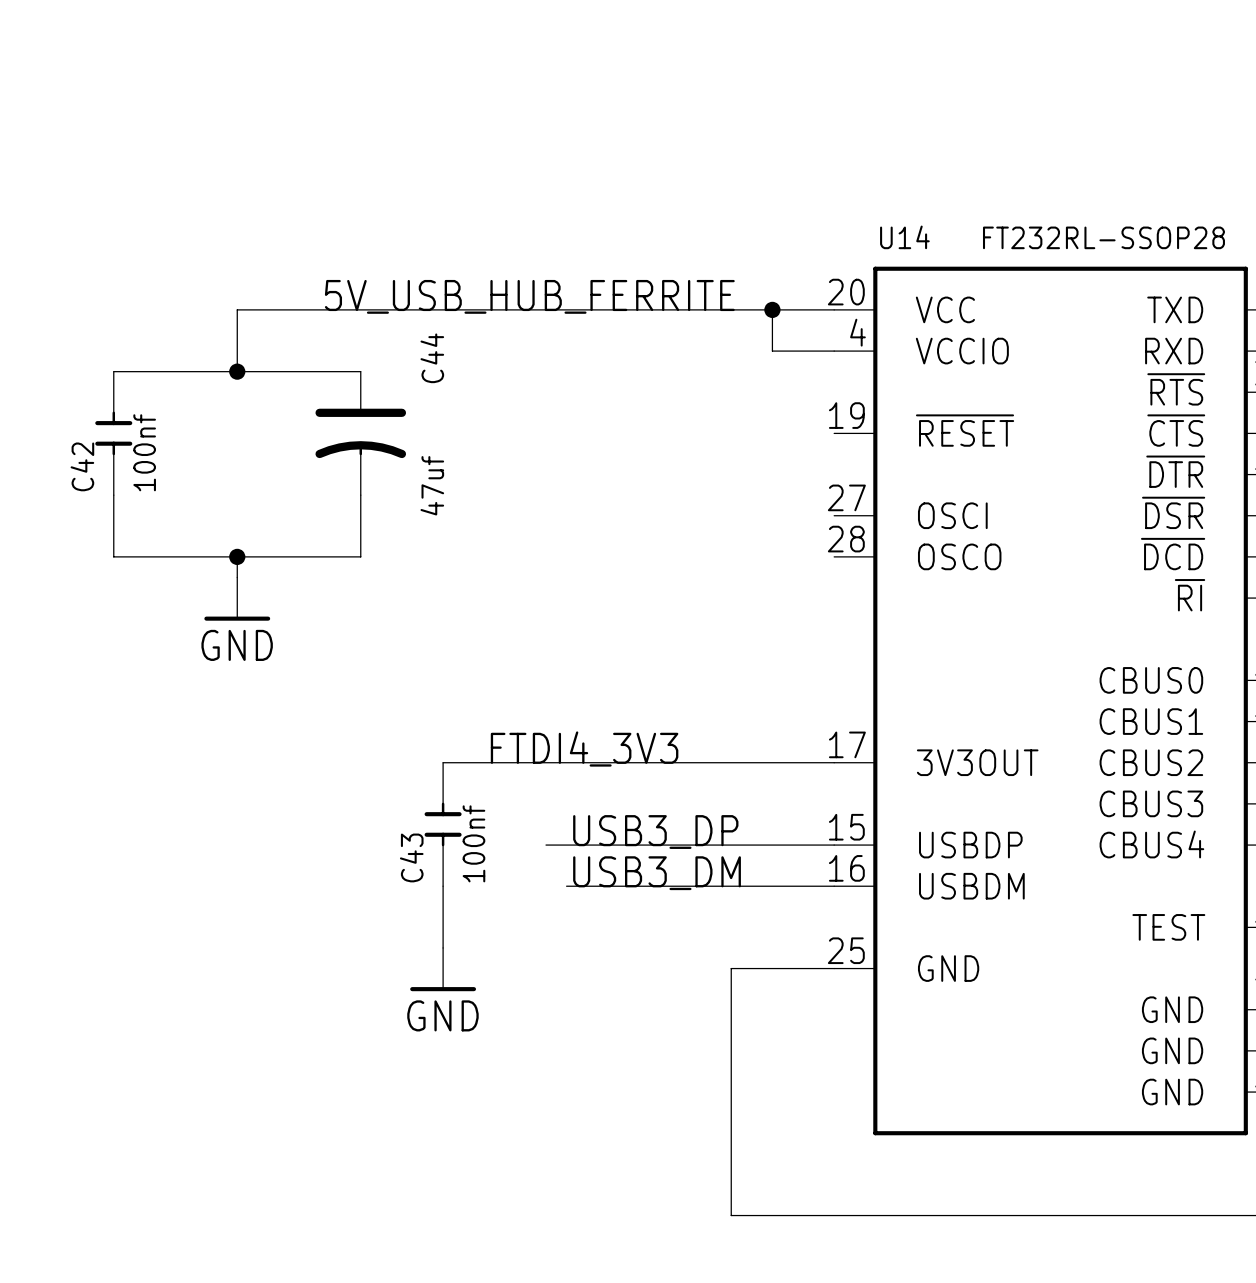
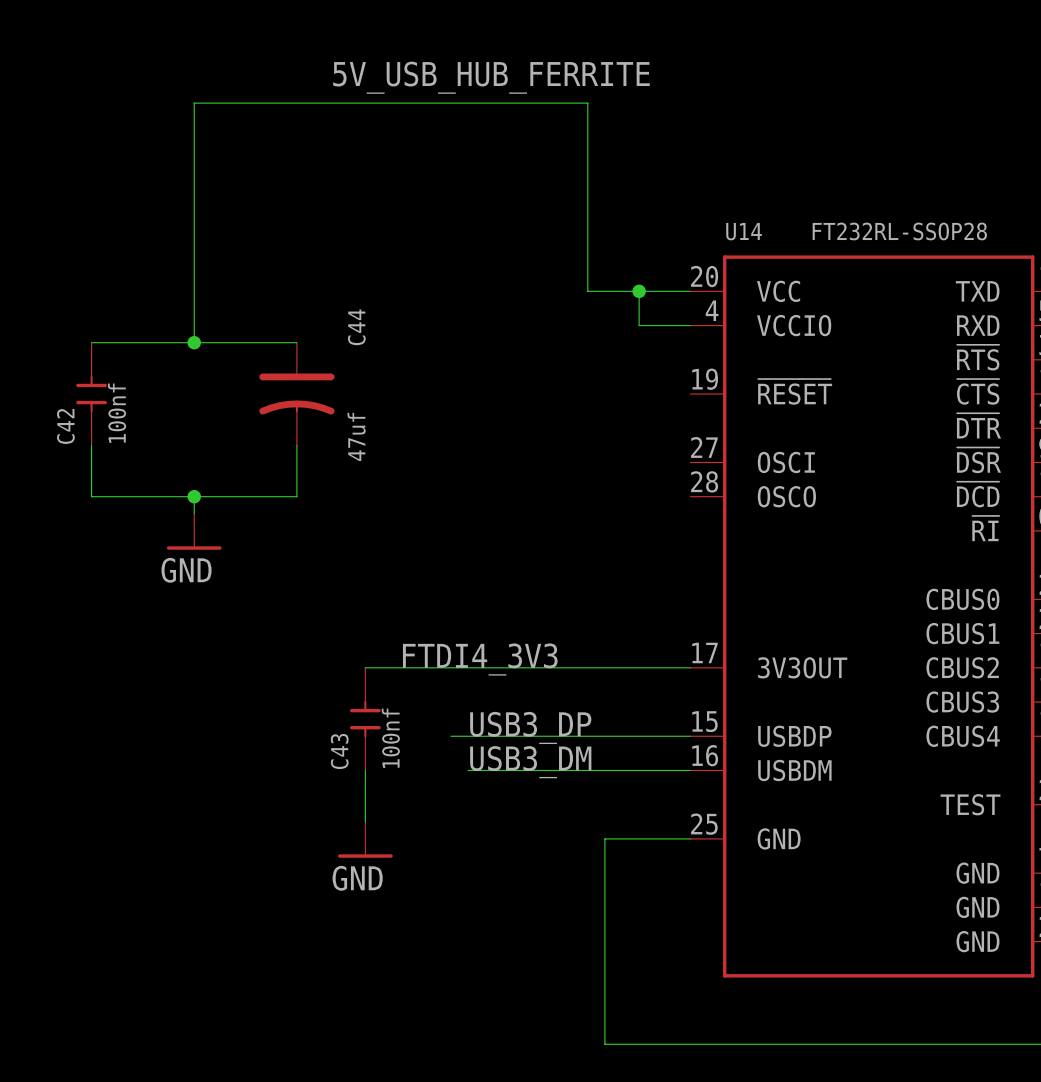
label position: 5V_USB_HUB_FERRITE (529, 296) -> 5V_USB_HUB_FERRITE (491, 77)
wire: (237, 309) (710, 309) -> (194, 291) (194, 103) (587, 103) (587, 291)

